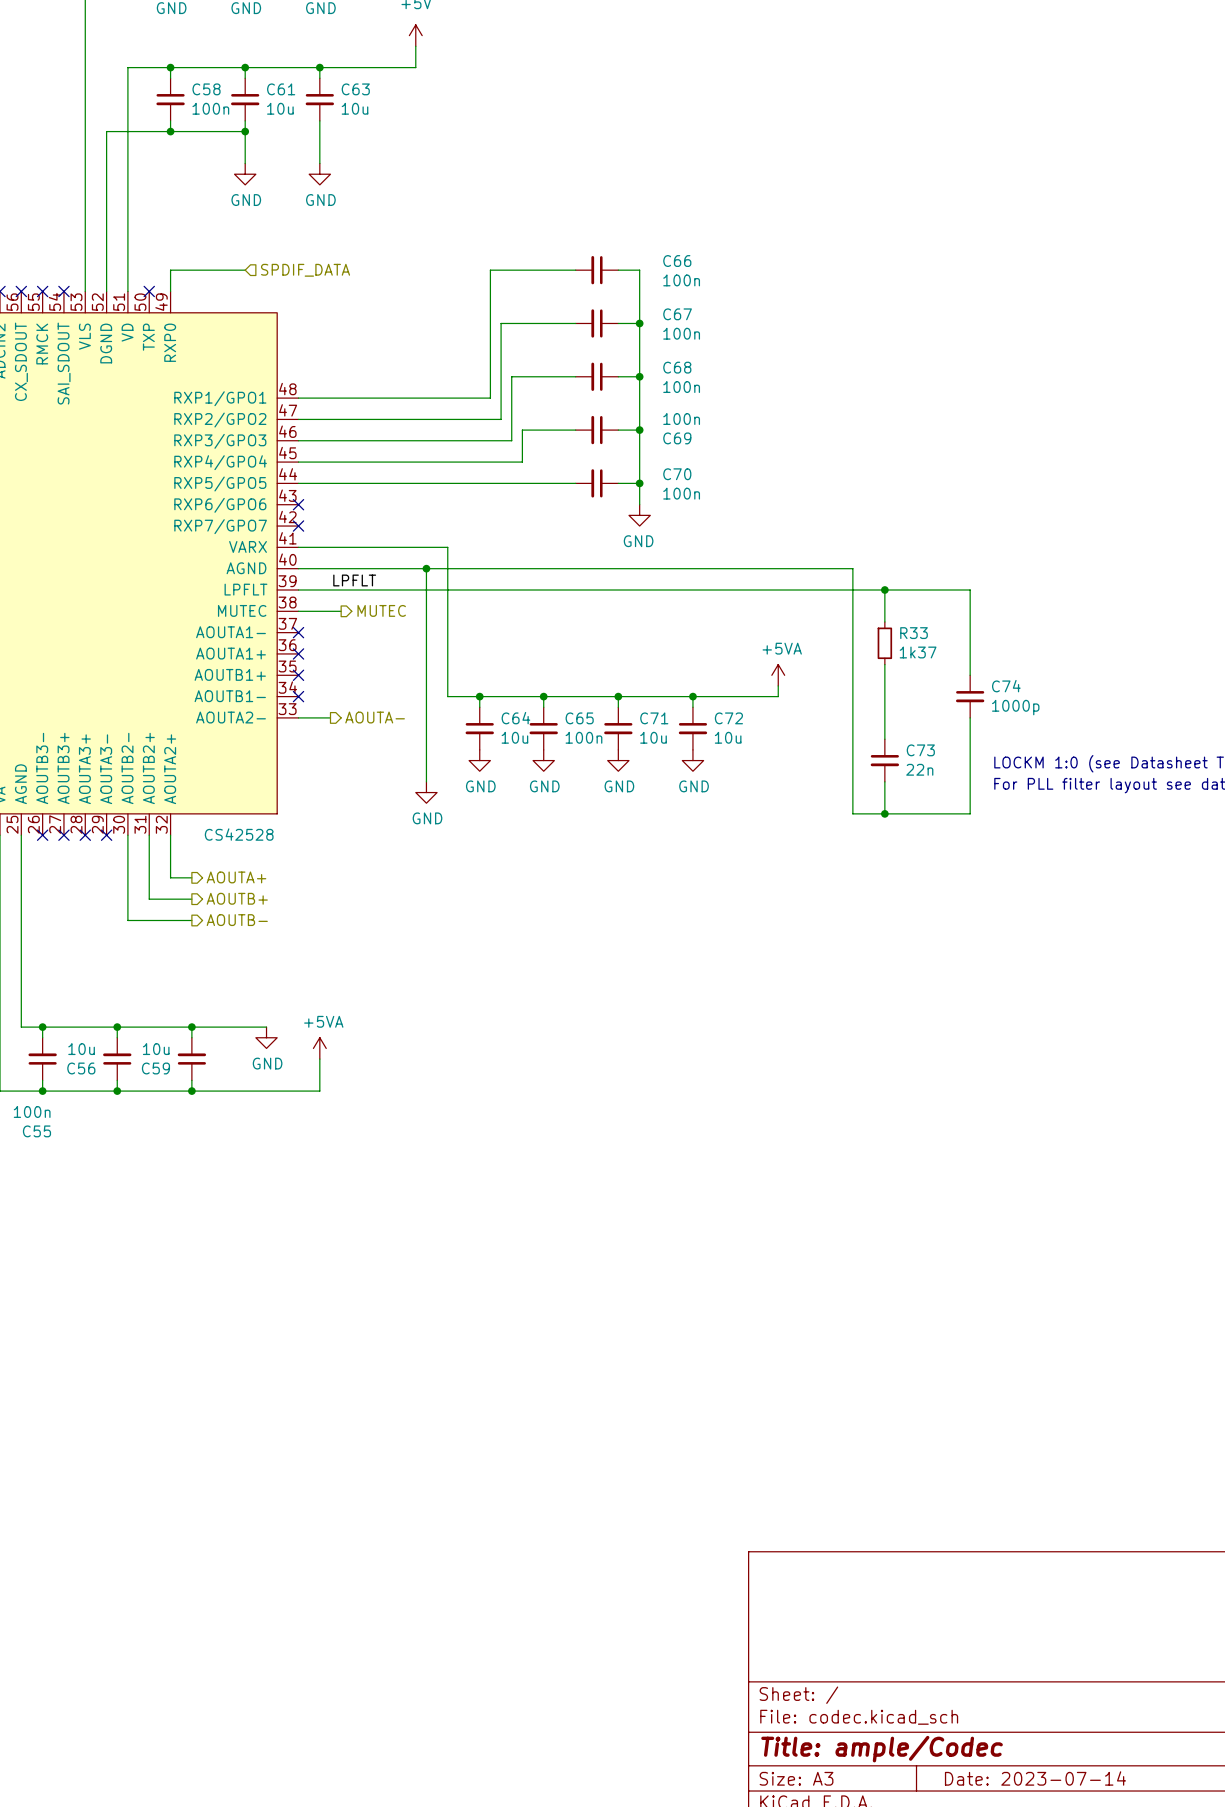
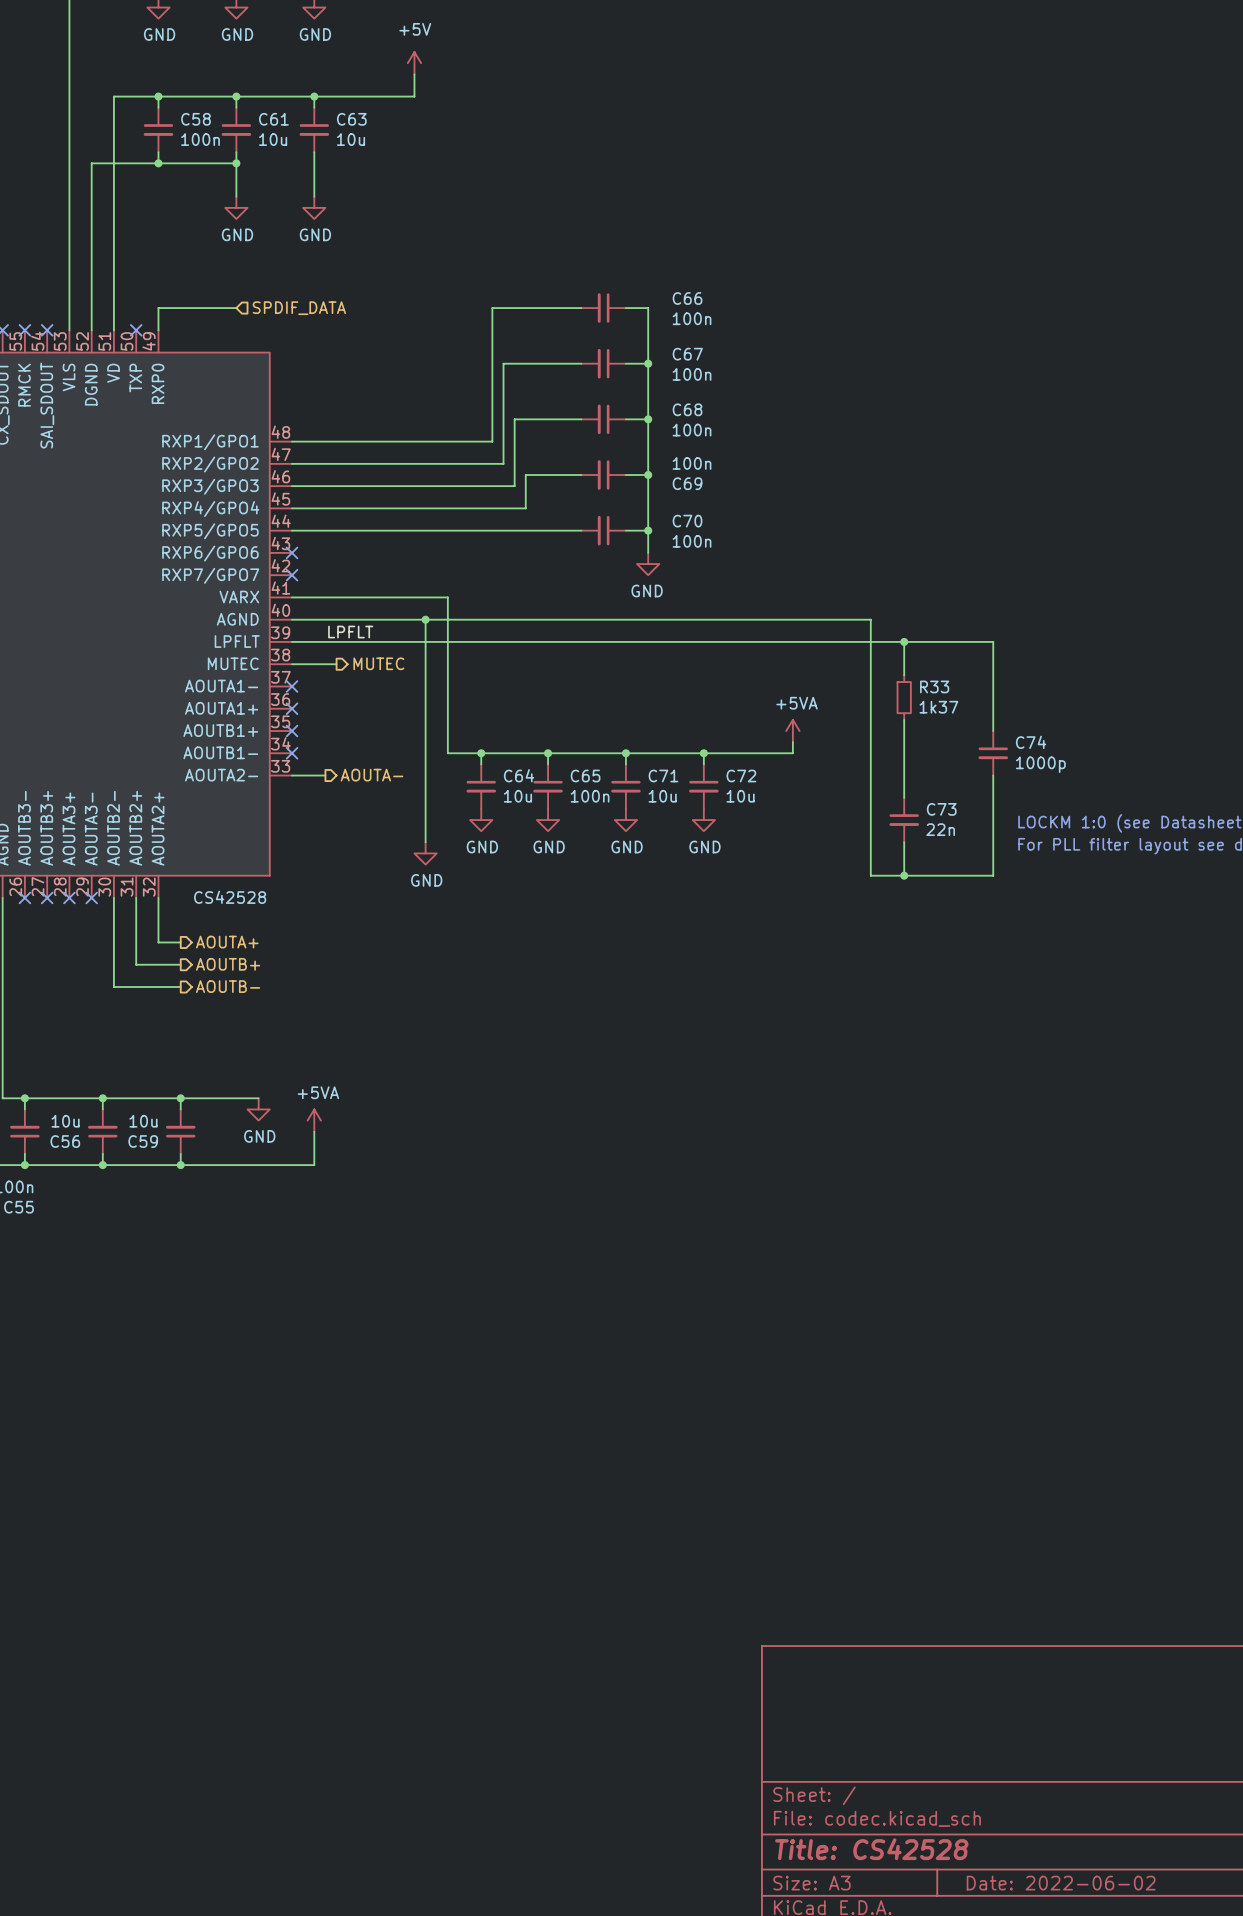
title block: Title: ample/Codec (882, 1749) -> Title: CS42528 (871, 1849)
title block: Date: 2023-07-14 (1035, 1778) -> Date: 2022-06-02 (1061, 1883)

